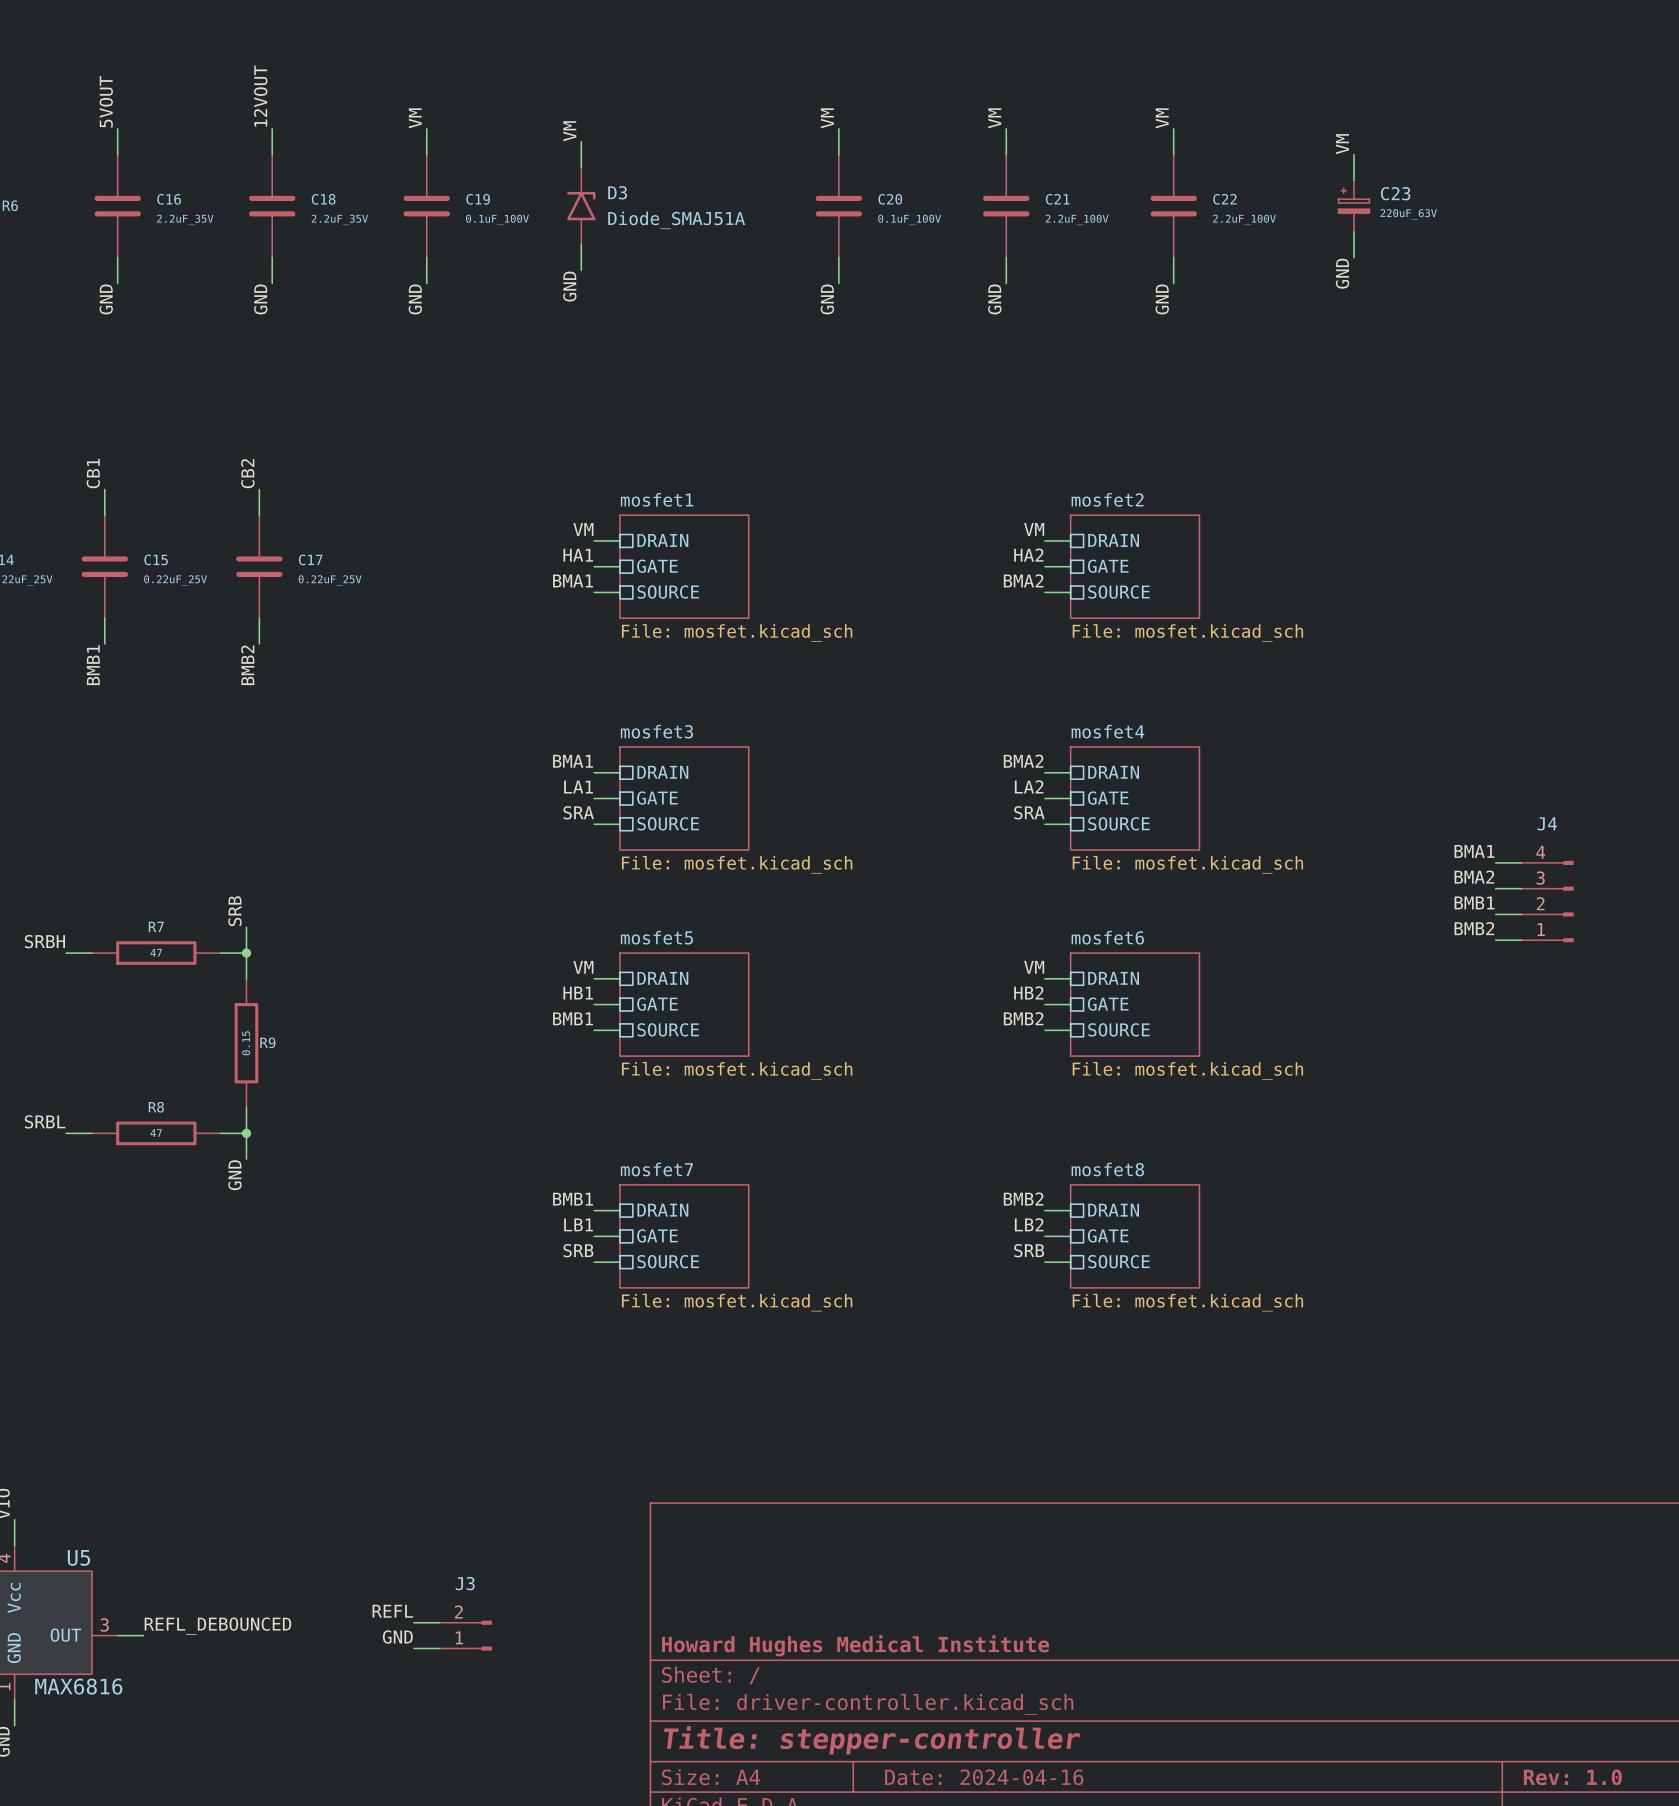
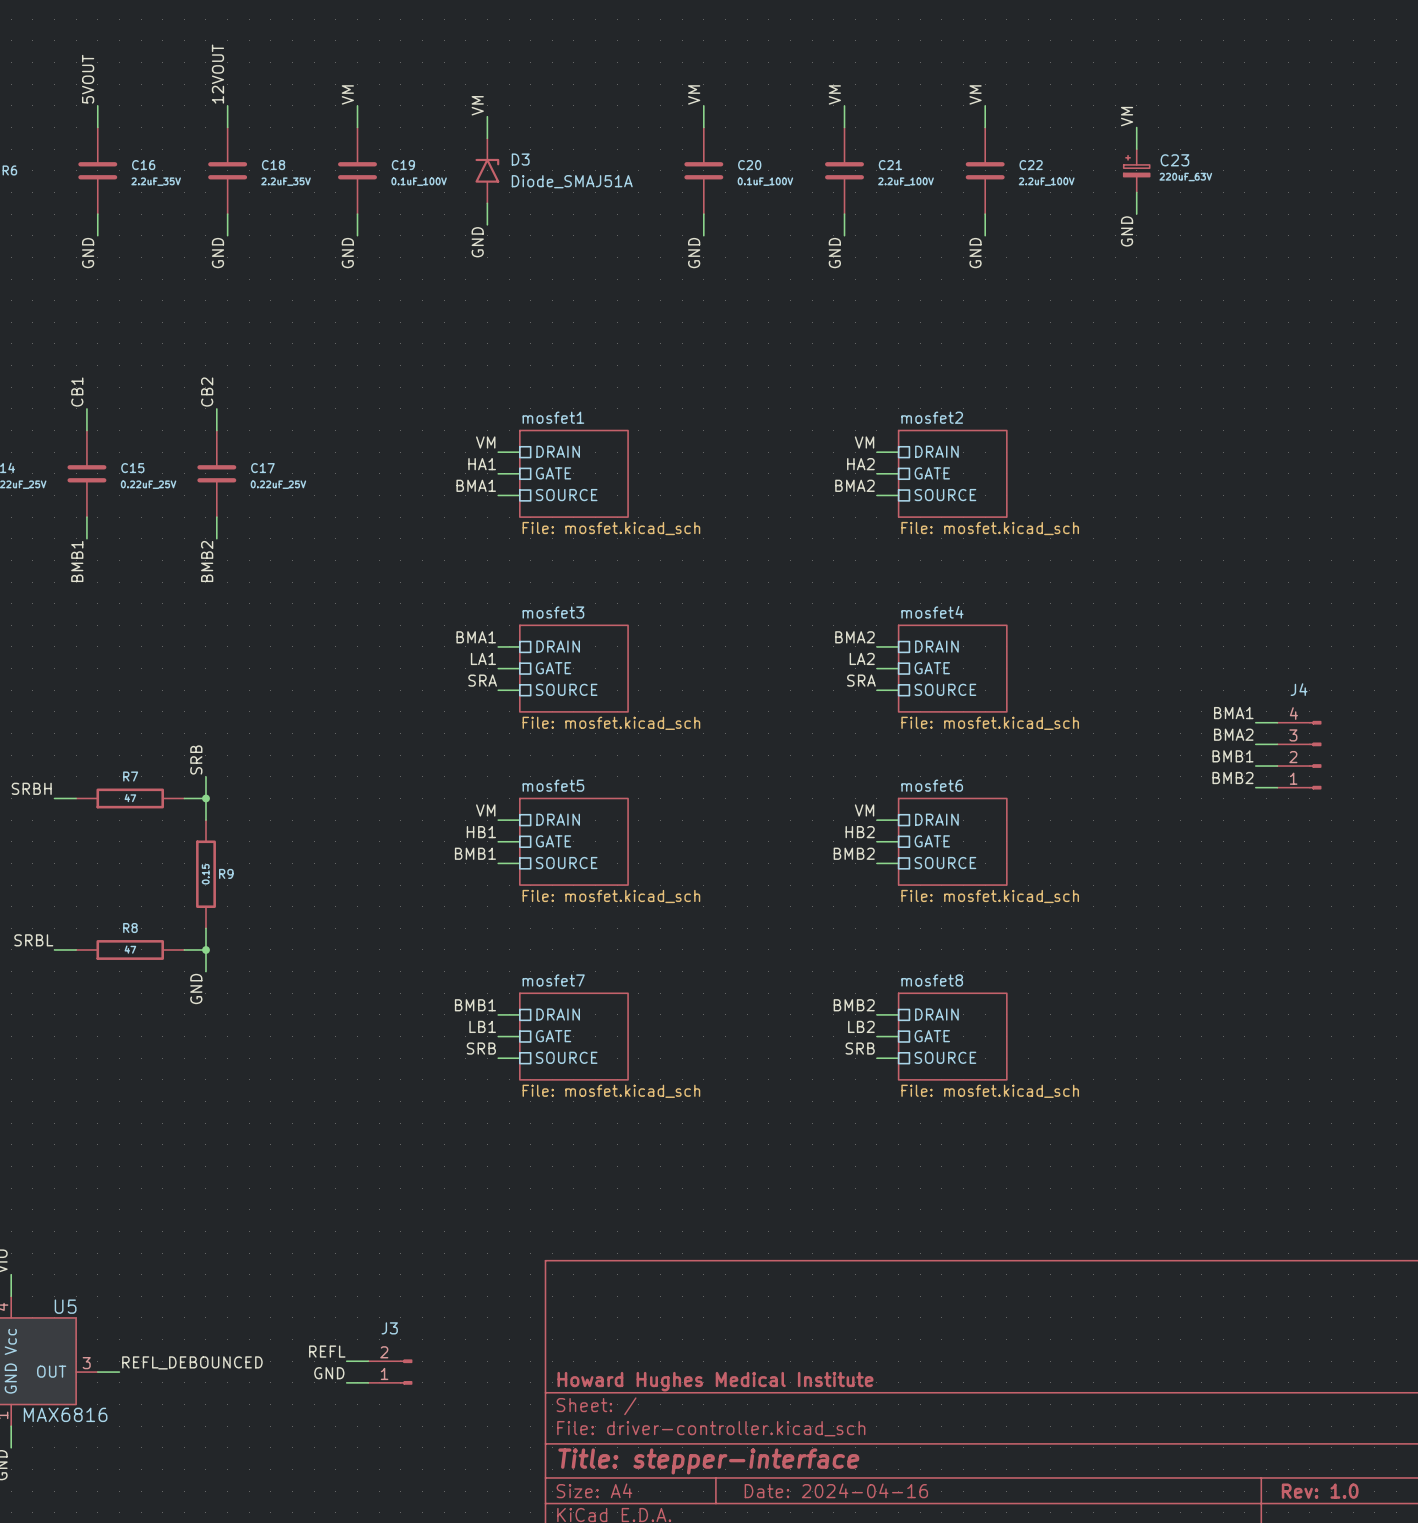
title block: Title: stepper-controller (871, 1740) -> Title: stepper-interface (708, 1461)

